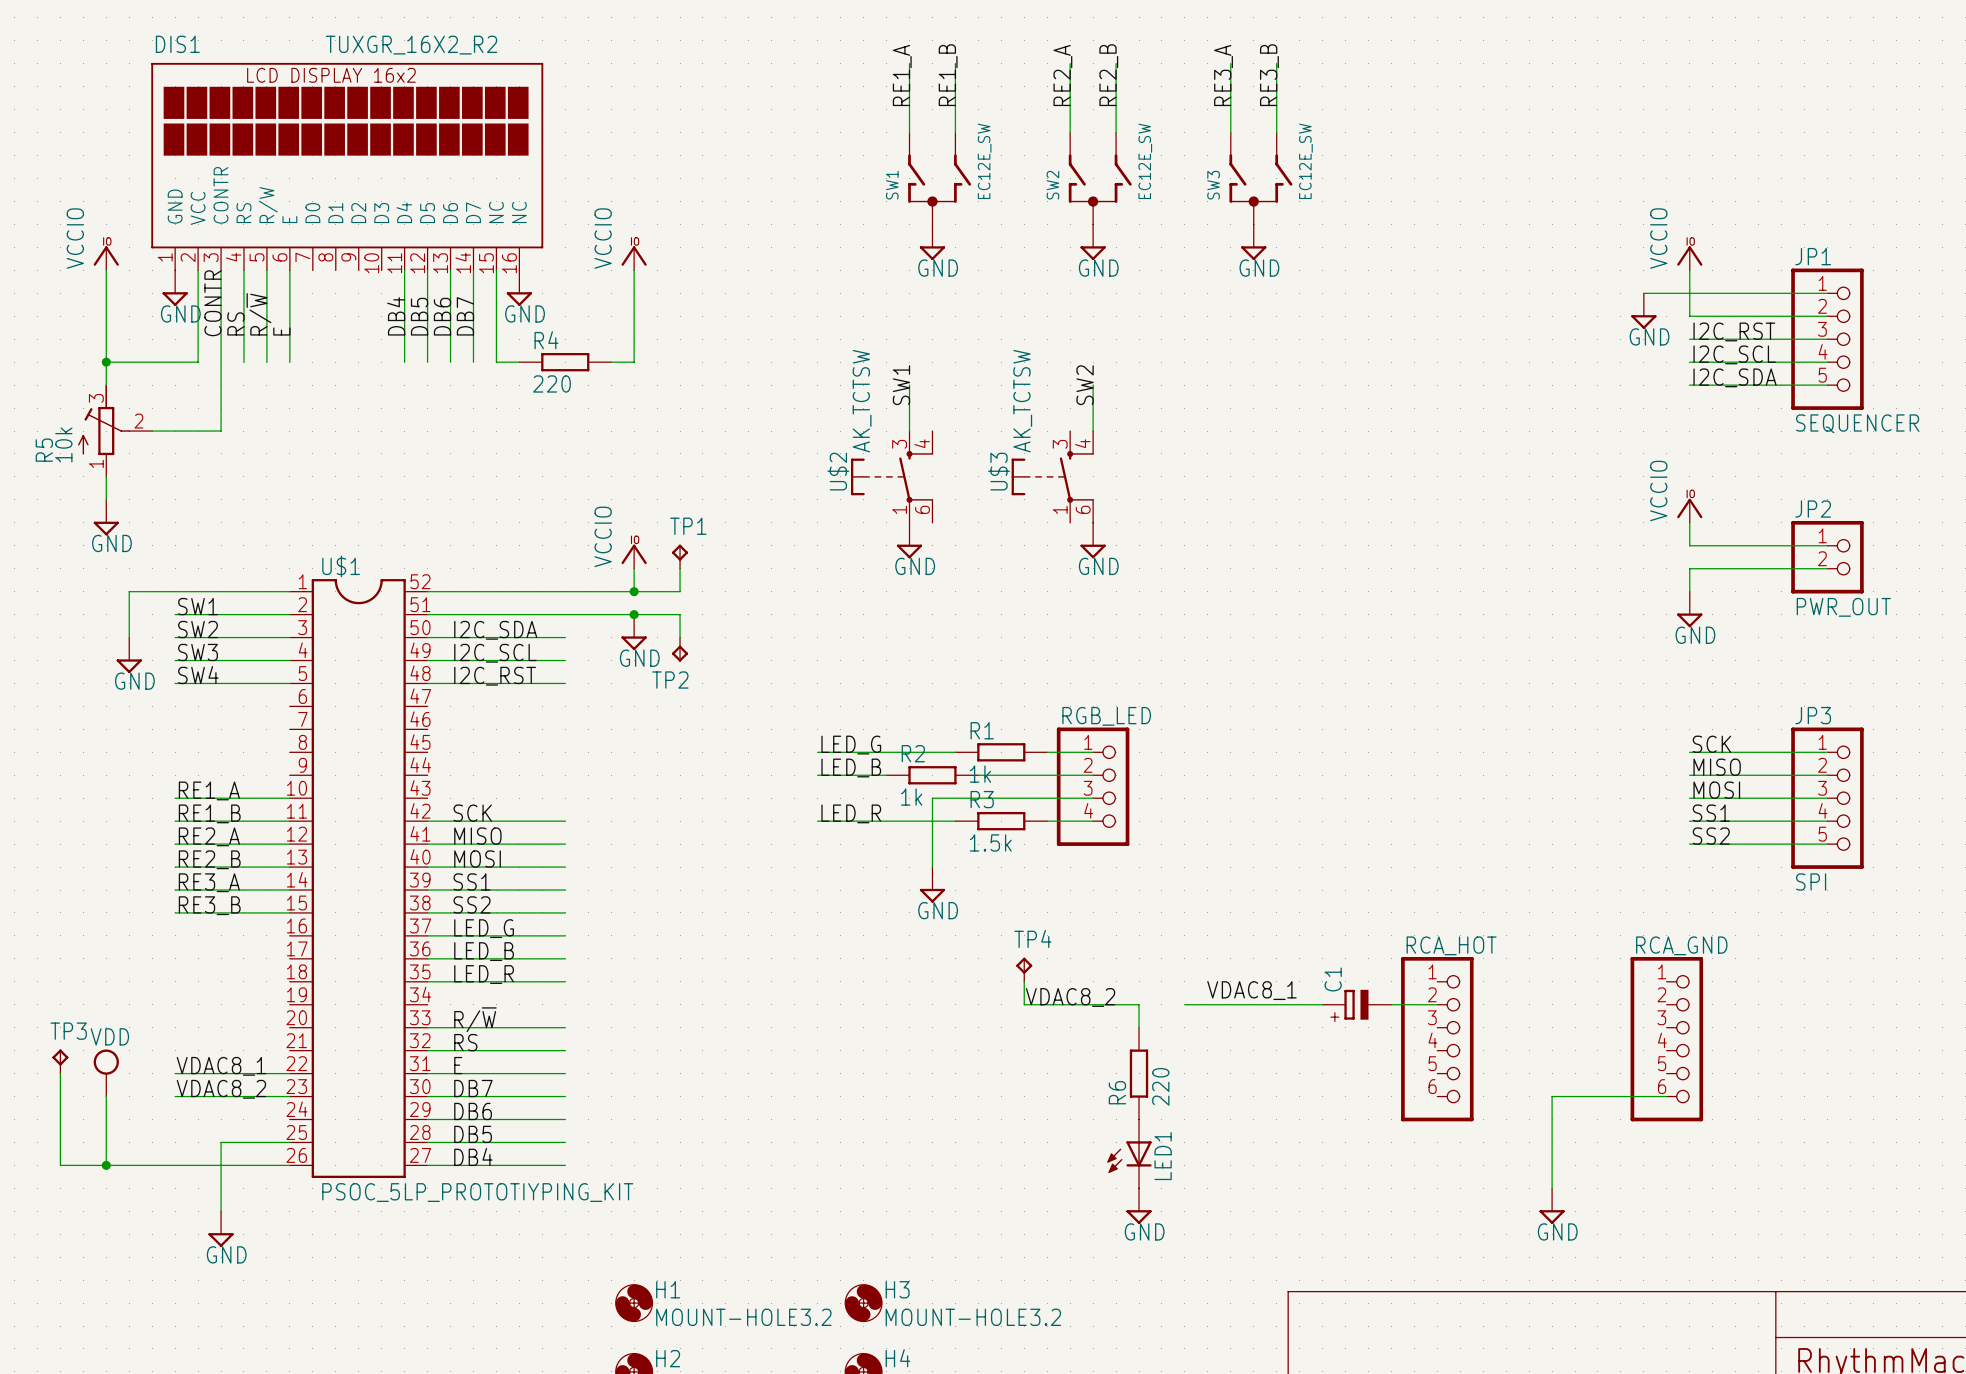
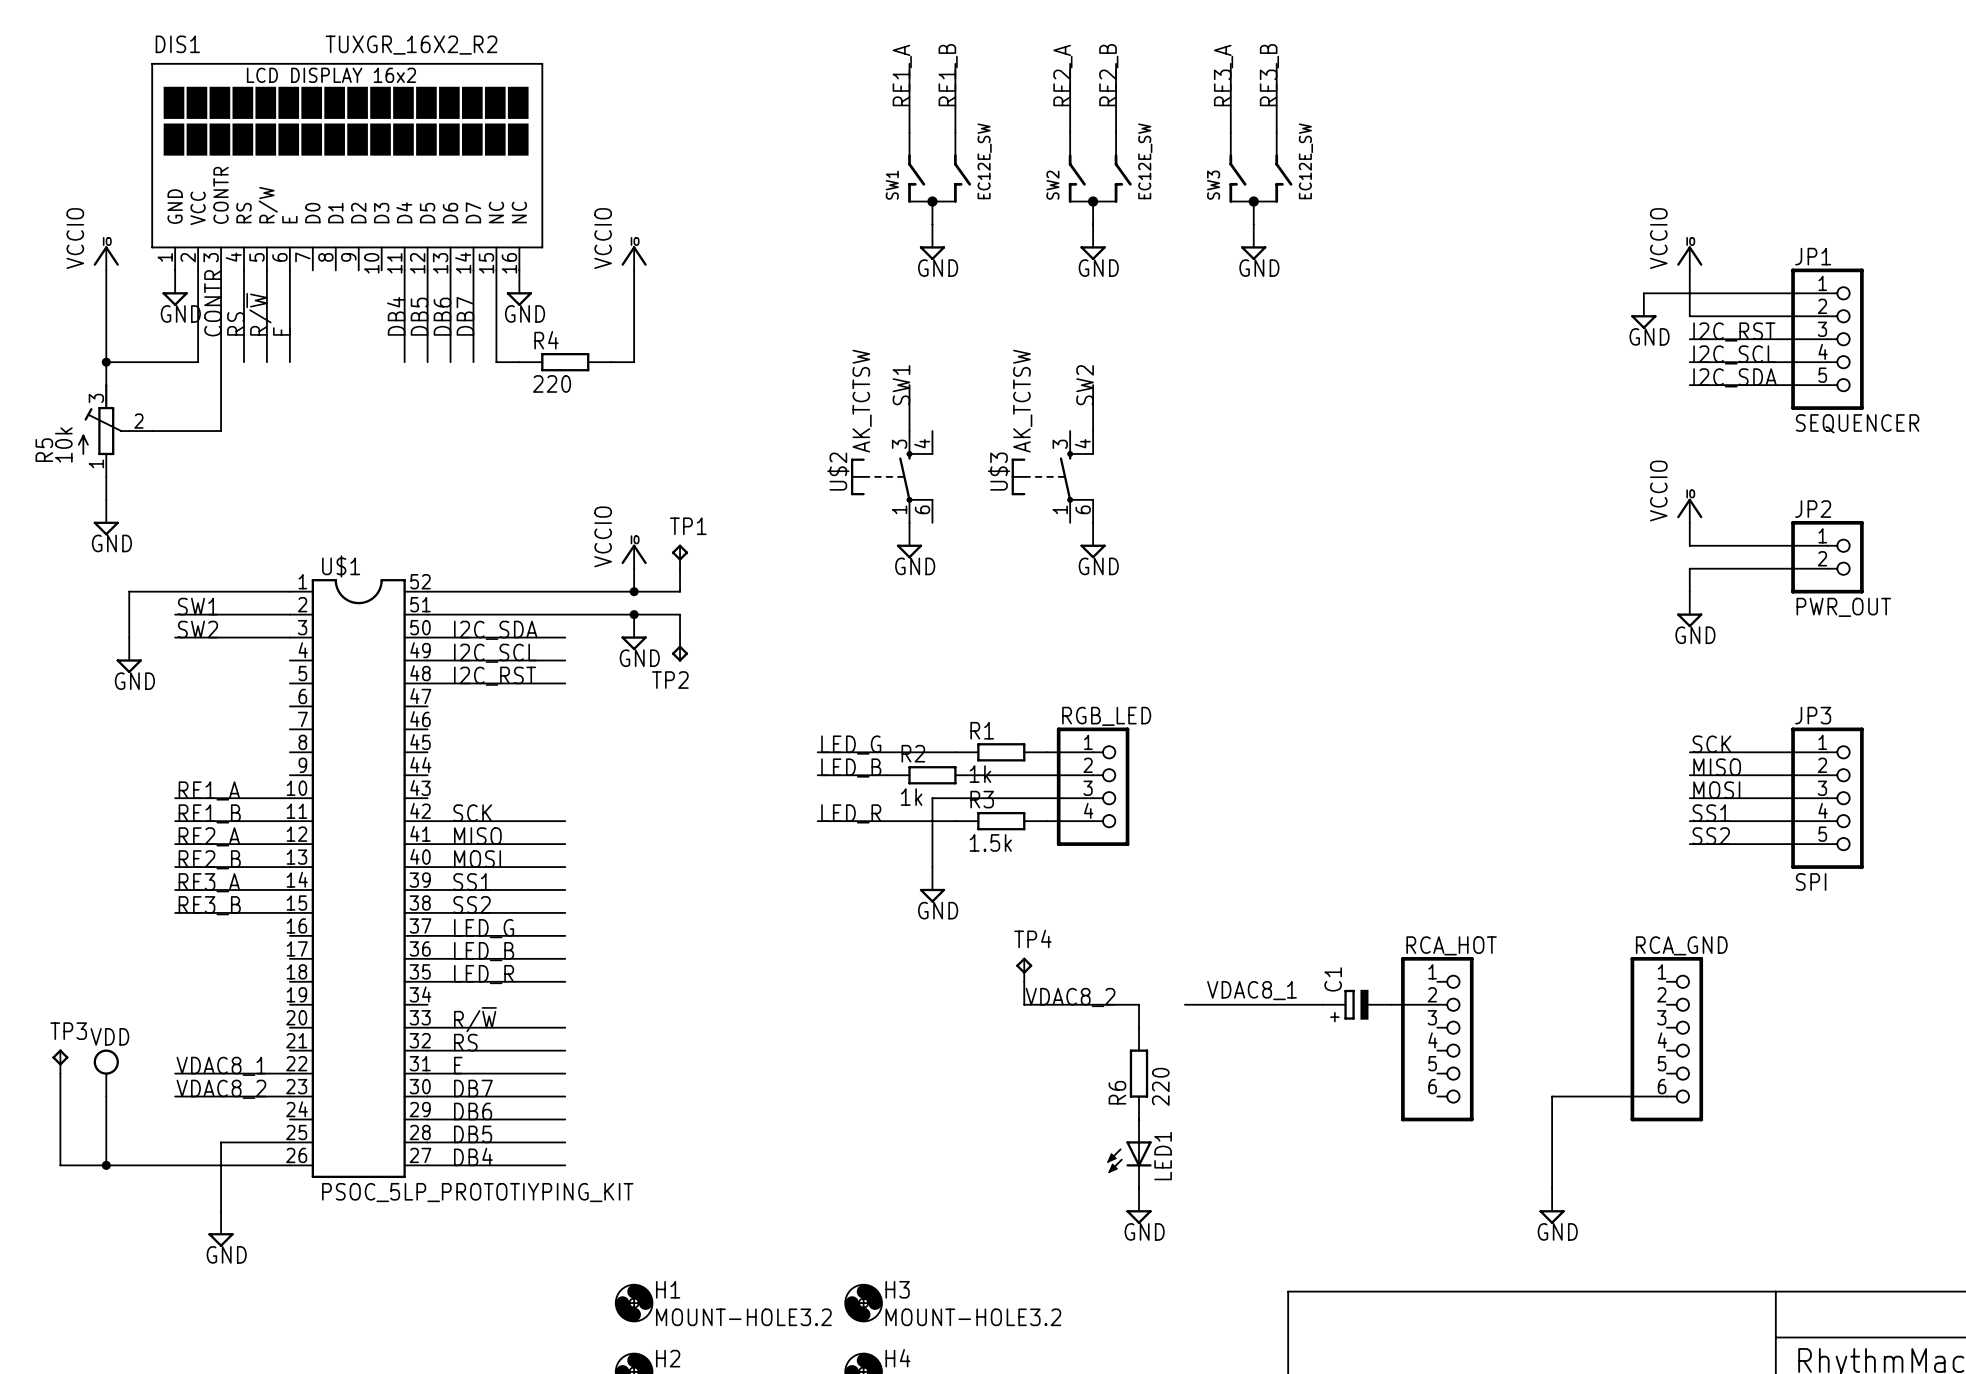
label: SW3 (198, 652) -> none
wire: (175, 660) (289, 660) -> none
label: SW4 (198, 675) -> none
wire: (175, 683) (289, 683) -> none

